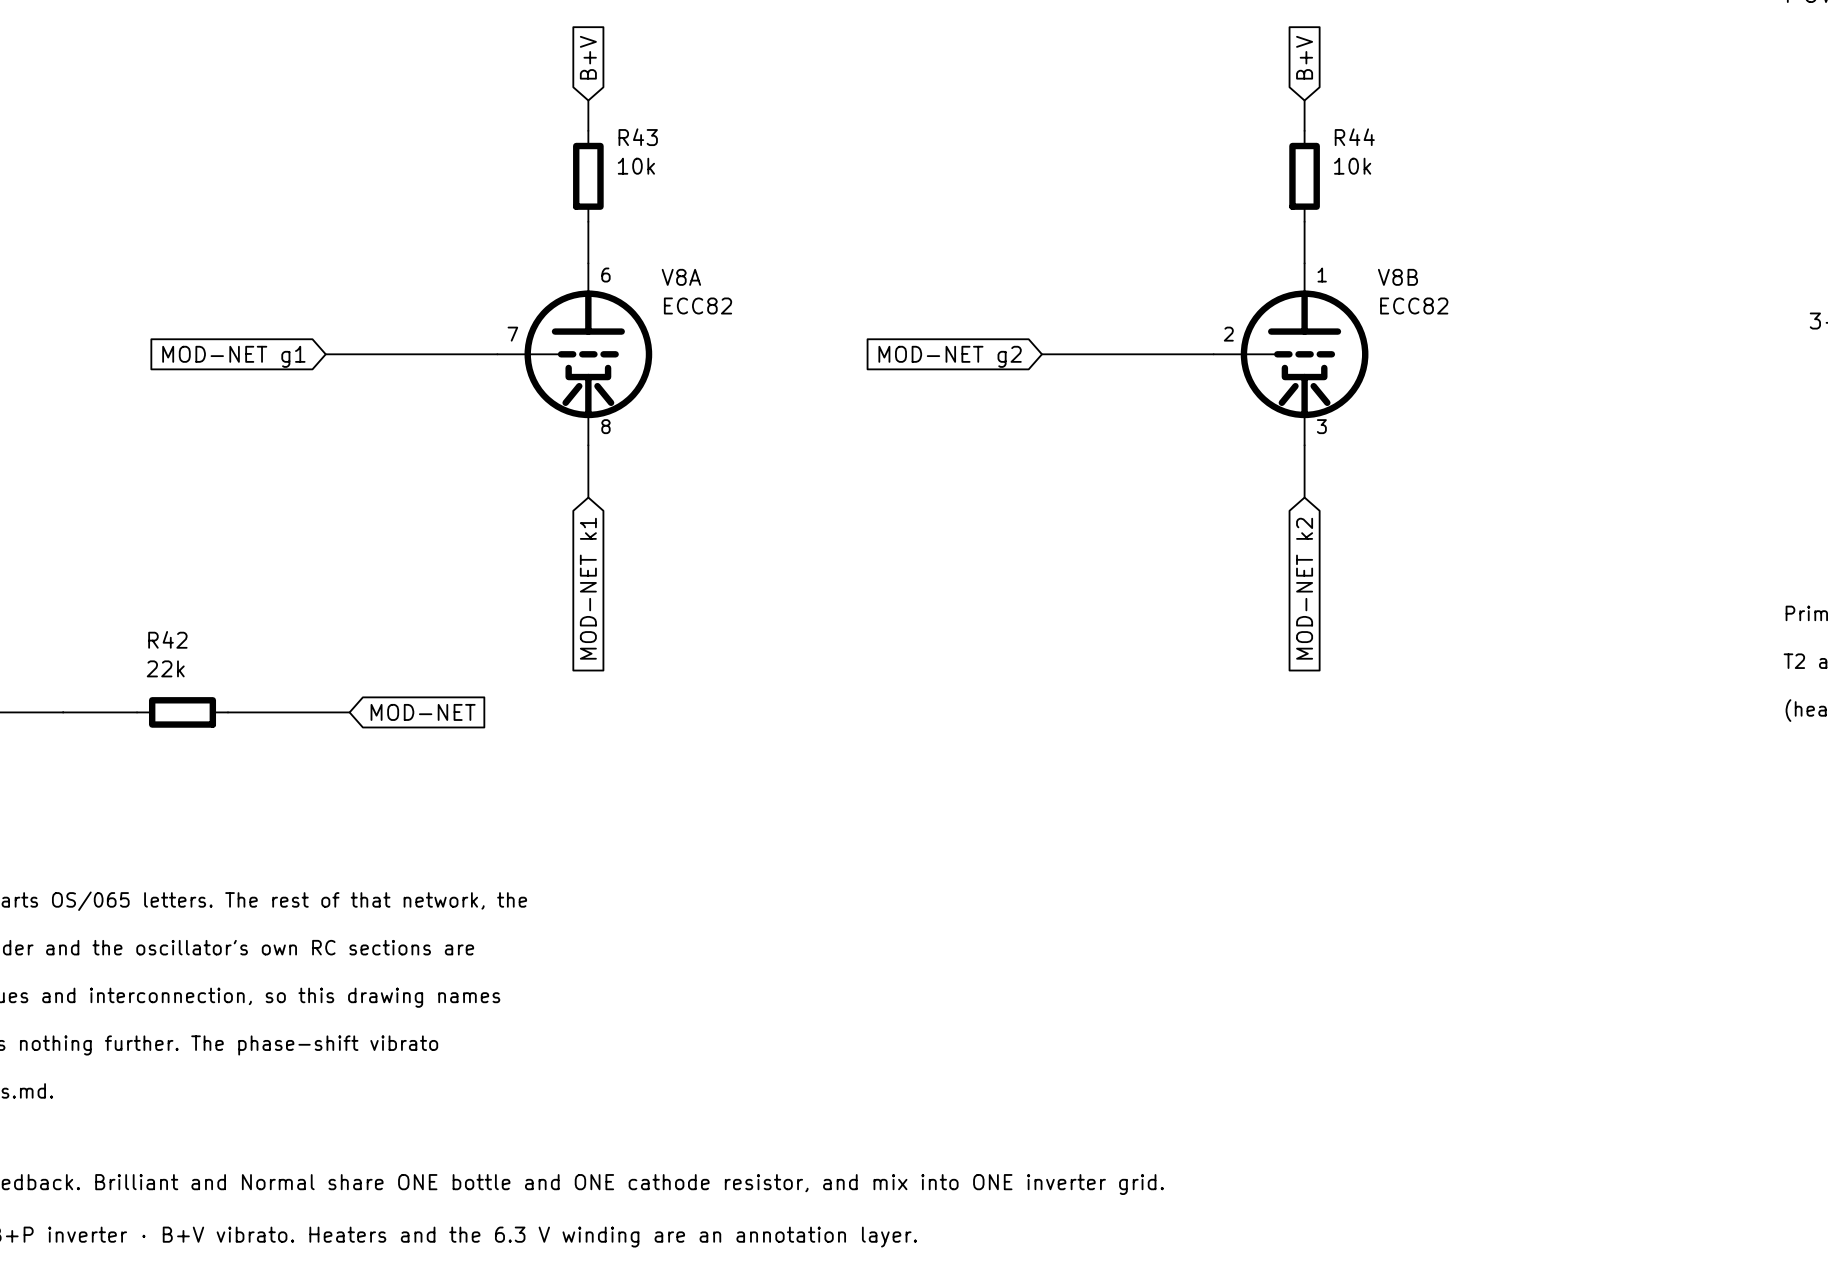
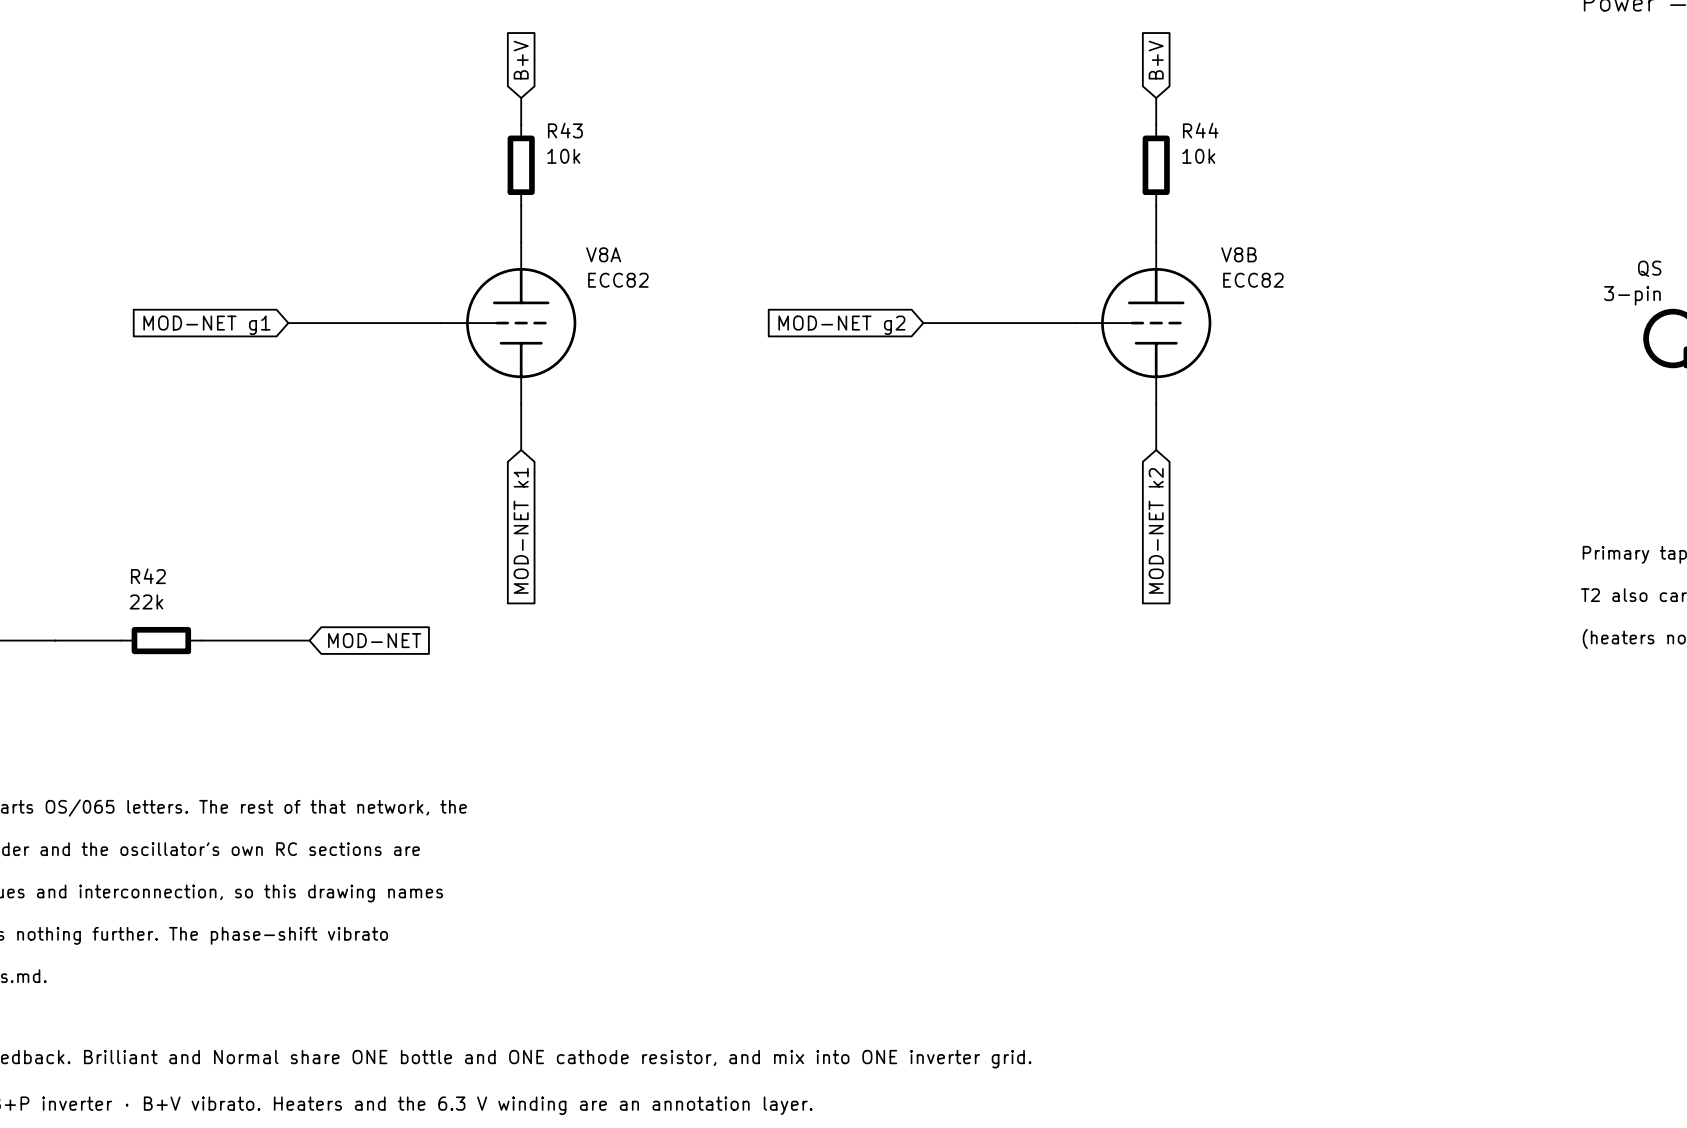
V8A symbol: [497, 263, 653, 446] -> [440, 242, 577, 404]
V8B symbol: [1213, 263, 1369, 446] -> [1075, 242, 1212, 404]
text: 6 (605, 275) -> none
text: 1 (1322, 275) -> none
text: 7 (512, 334) -> none
text: 2 (1228, 334) -> none
text: 8 (605, 426) -> none
text: 3 (1321, 426) -> none

